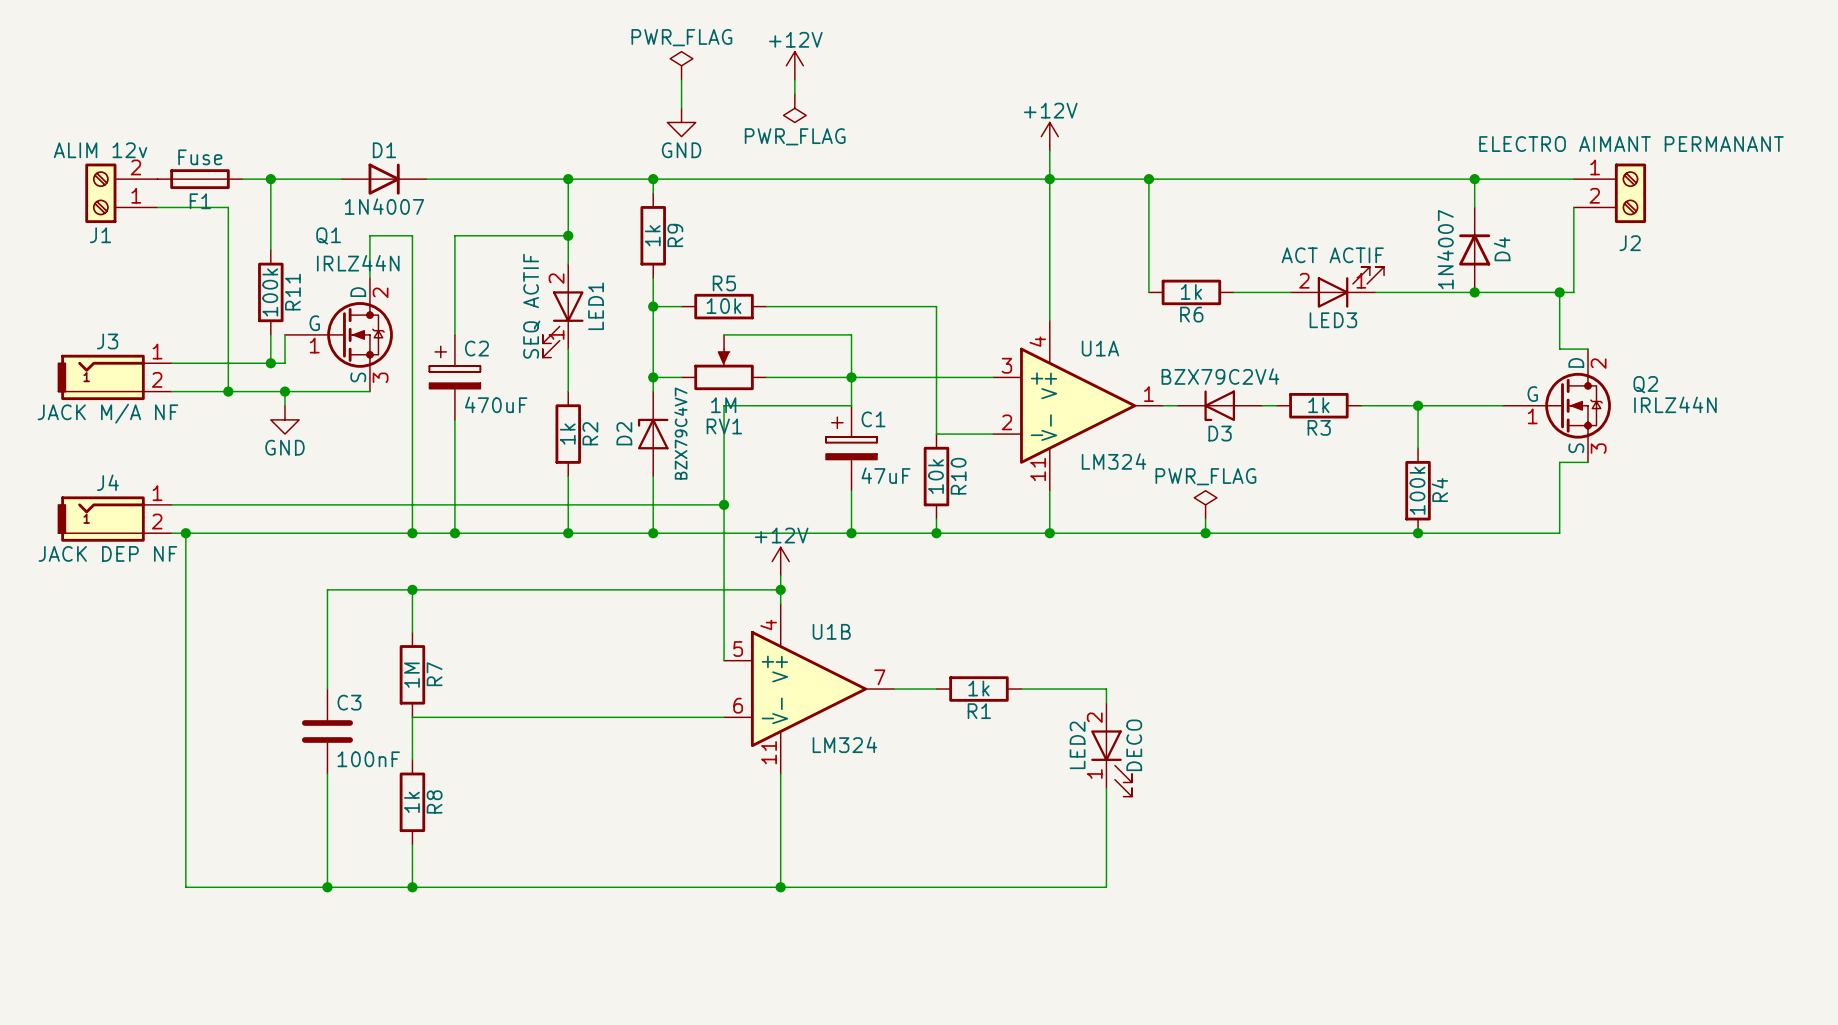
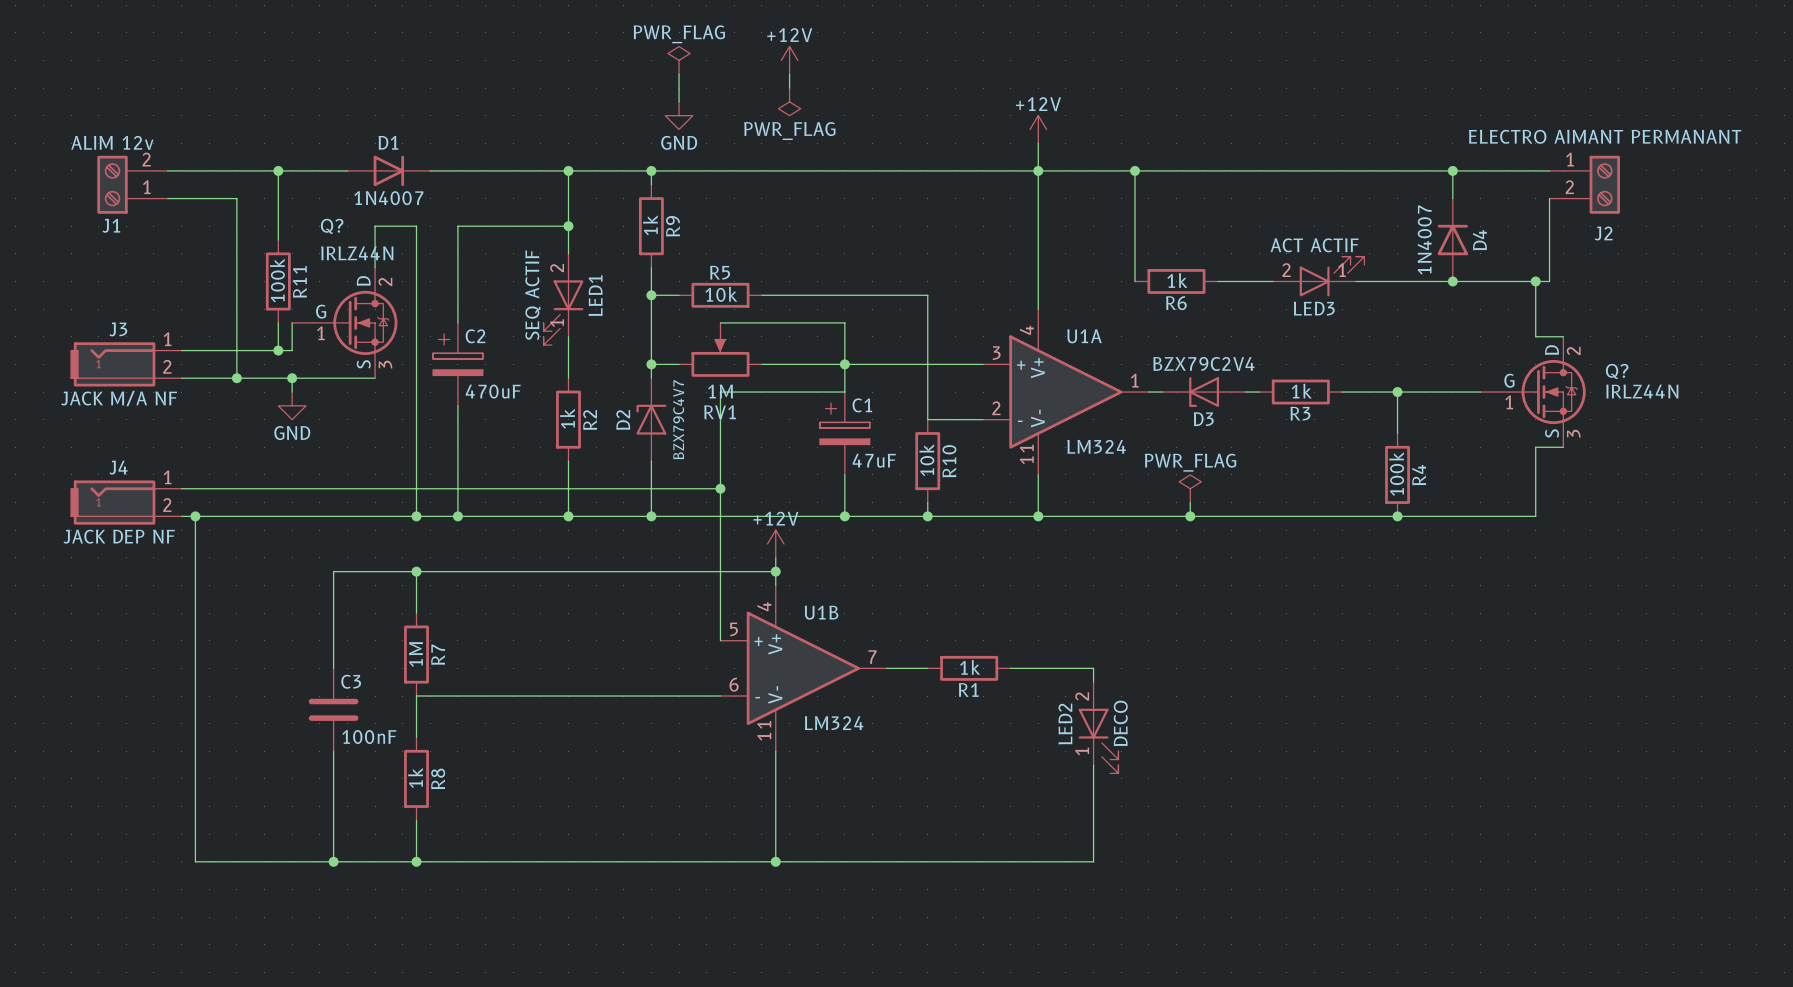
F1: Fuse (199, 179) -> none
Q1 name: Q1 (328, 235) -> Q? (332, 226)
Q2 name: Q2 (1645, 384) -> Q? (1617, 371)

